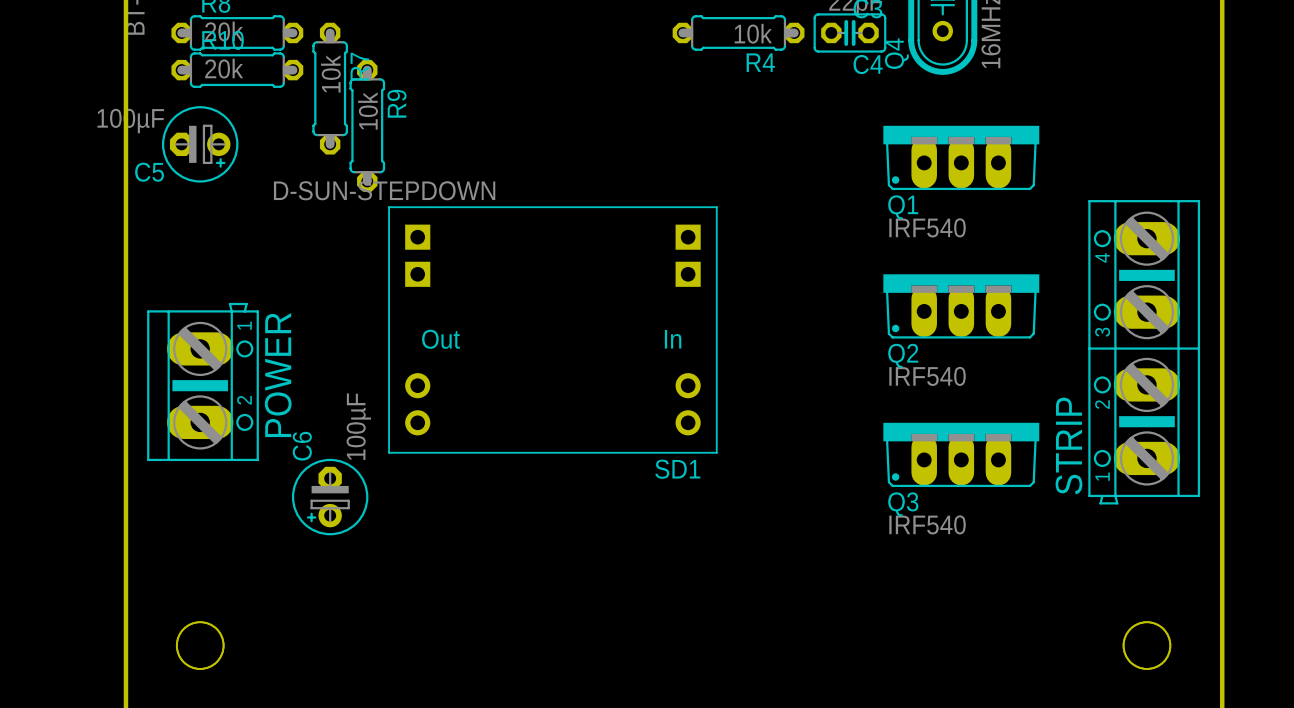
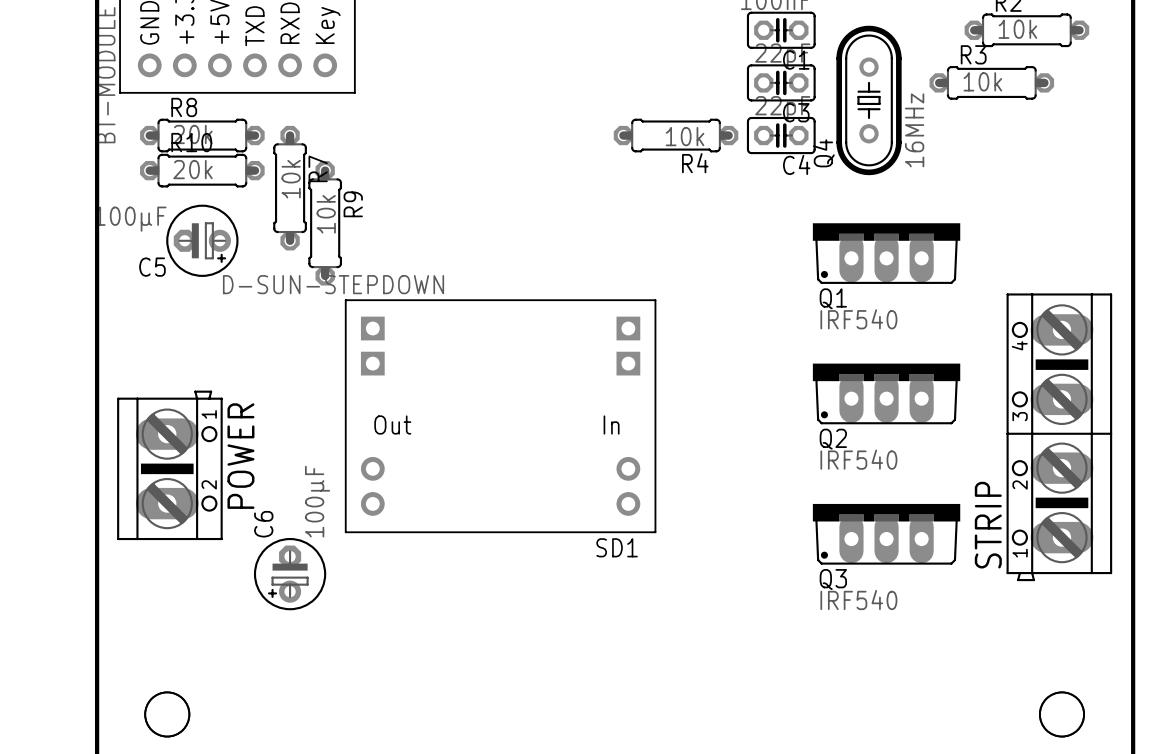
C5 position: (200, 144) -> (202, 240)

